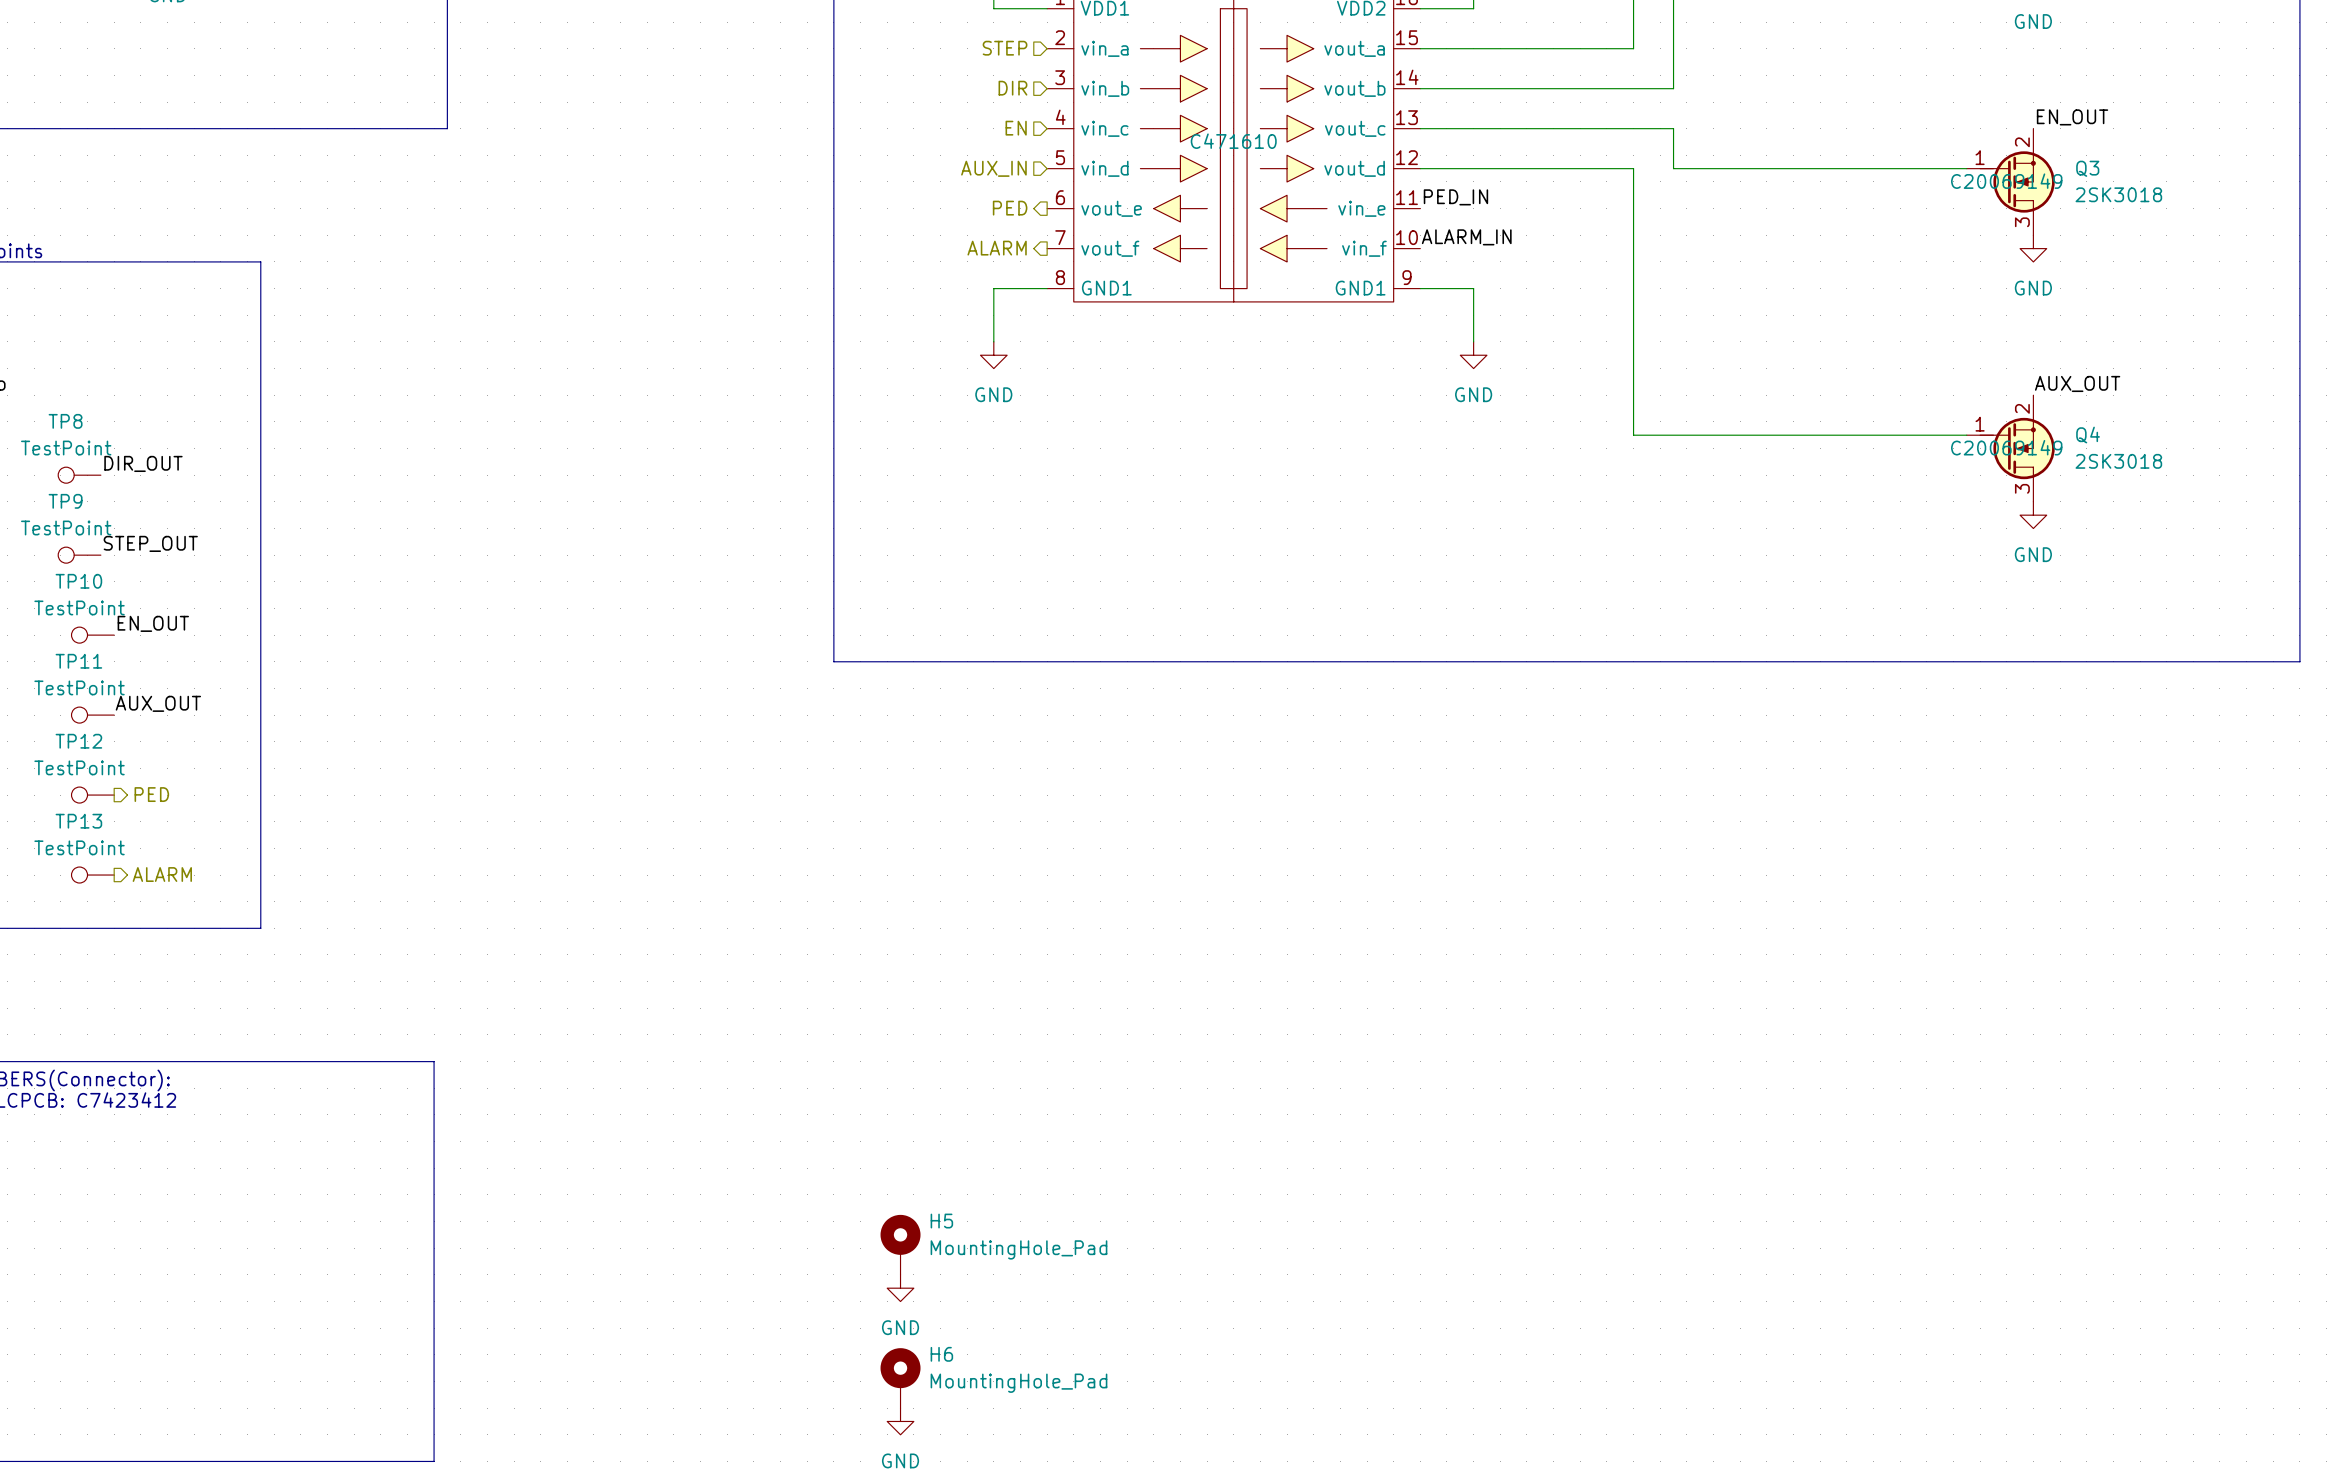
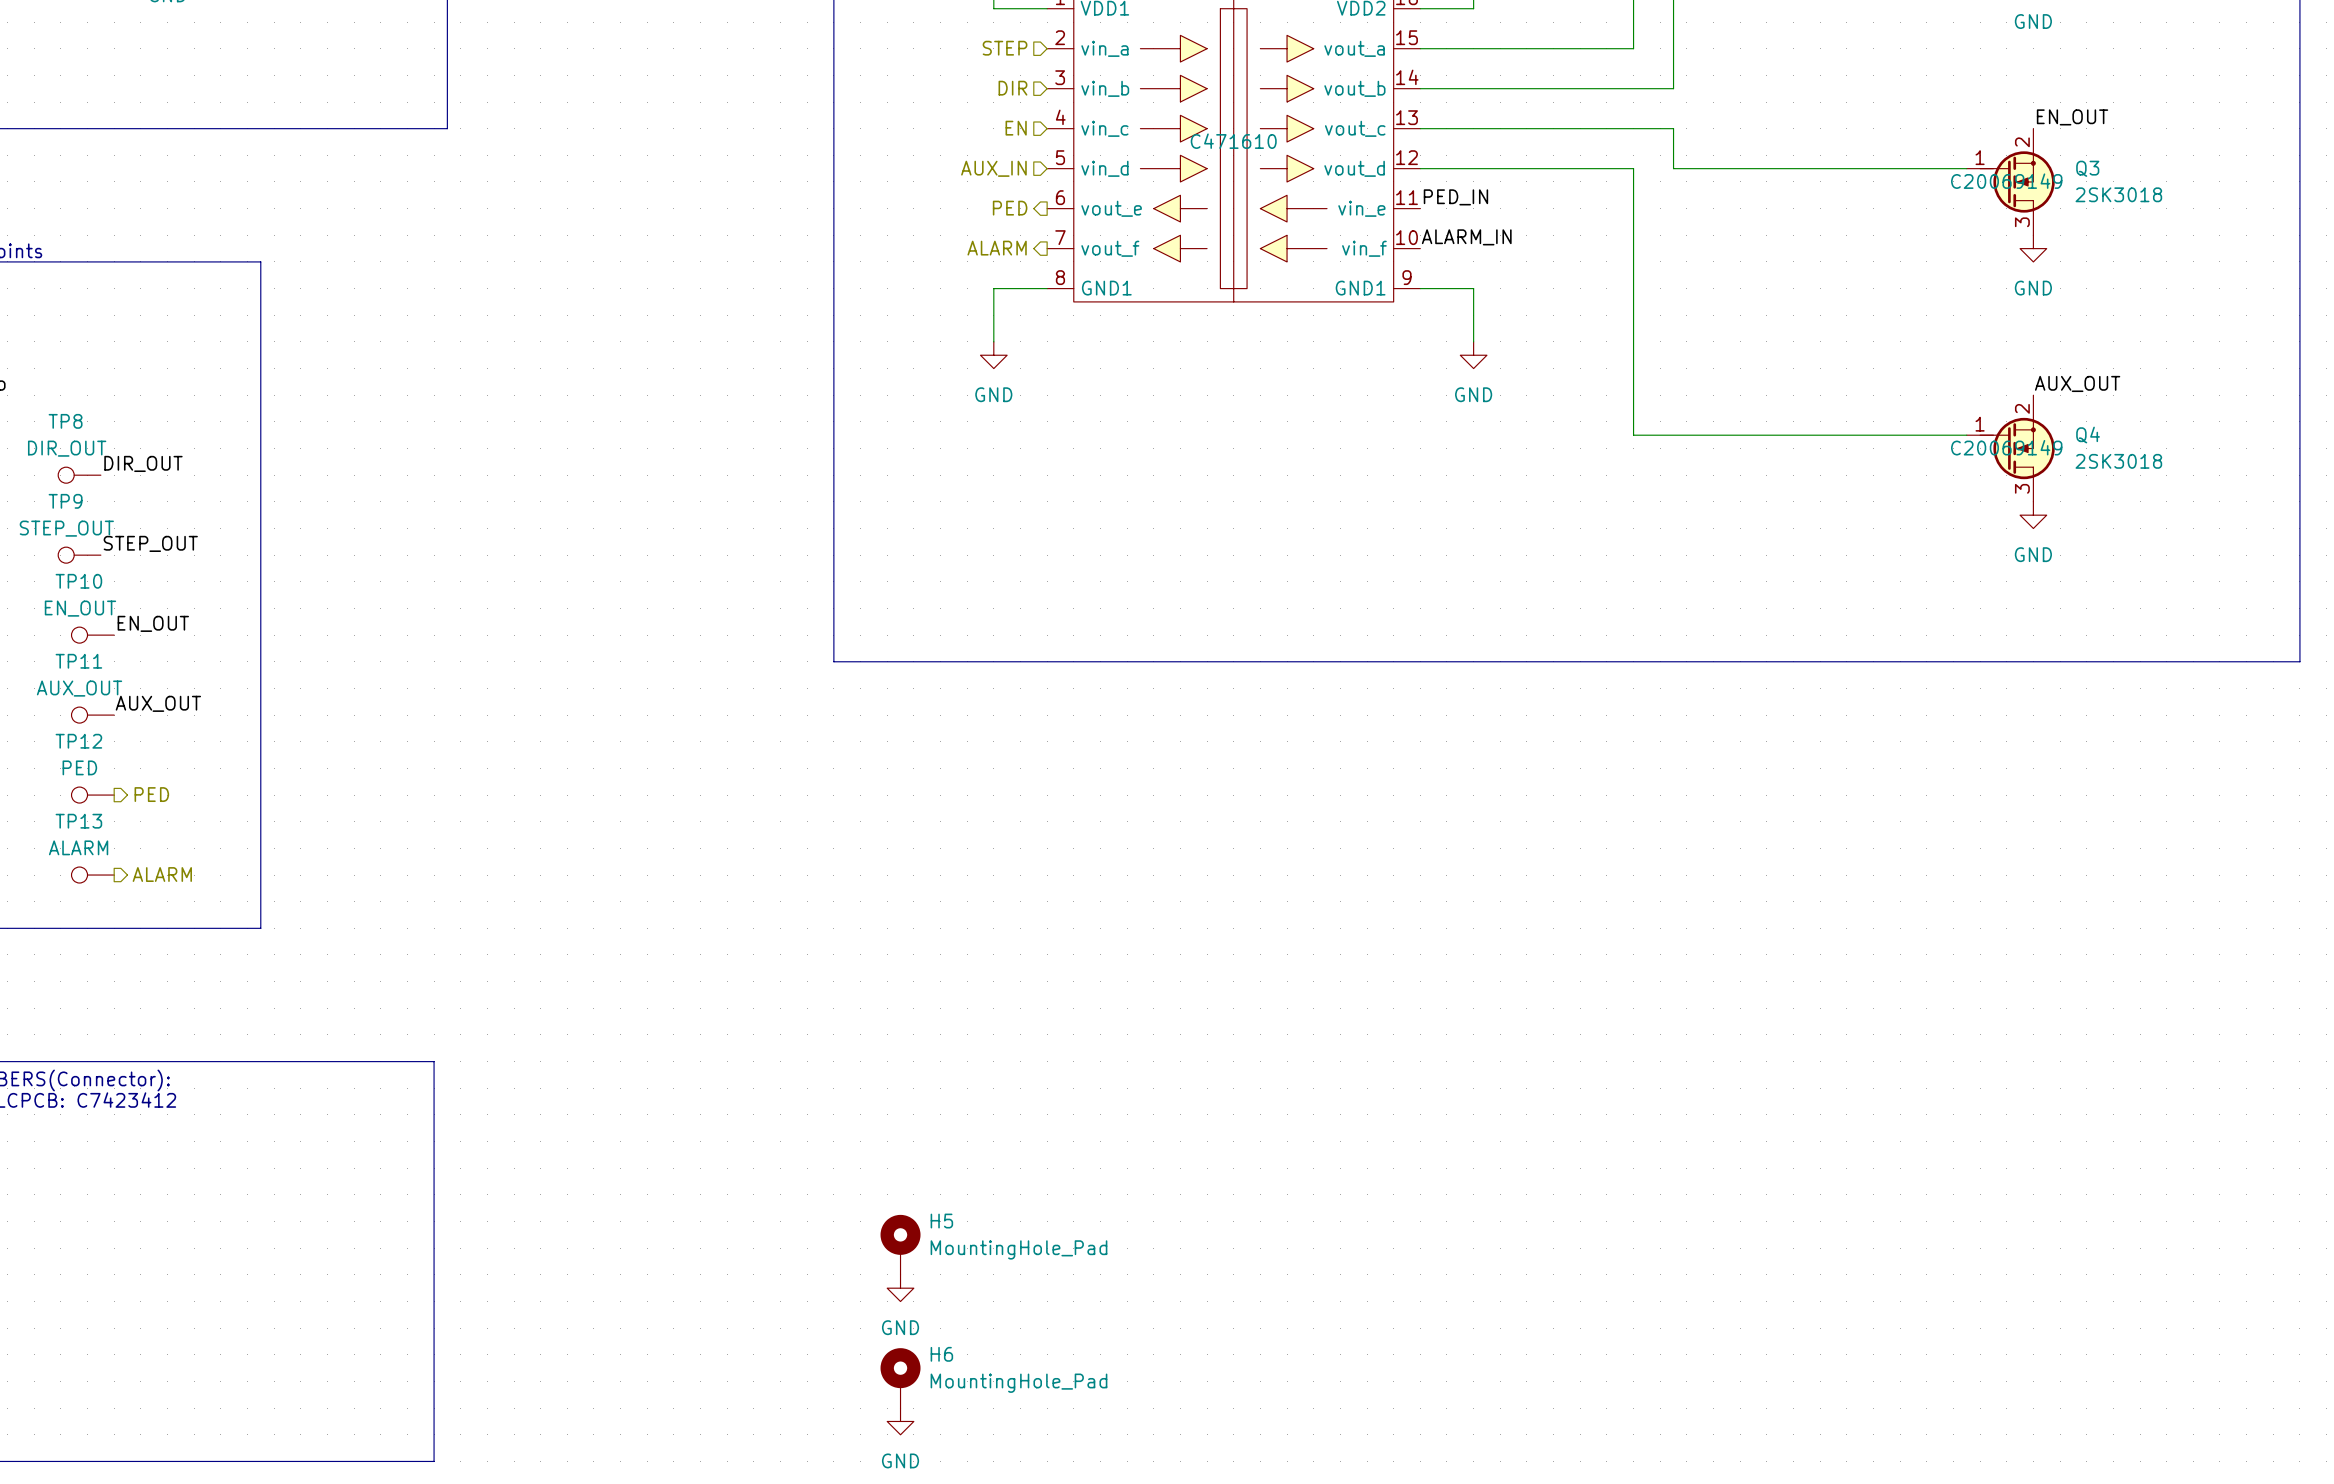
TP8 value: TestPoint (66, 448) -> DIR_OUT (67, 448)
TP9 value: TestPoint (66, 528) -> STEP_OUT (66, 528)
TP10 value: TestPoint (79, 607) -> EN_OUT (80, 608)
TP11 value: TestPoint (79, 687) -> AUX_OUT (79, 688)
TP12 value: TestPoint (79, 767) -> PED (79, 767)
TP13 value: TestPoint (79, 847) -> ALARM (78, 847)

